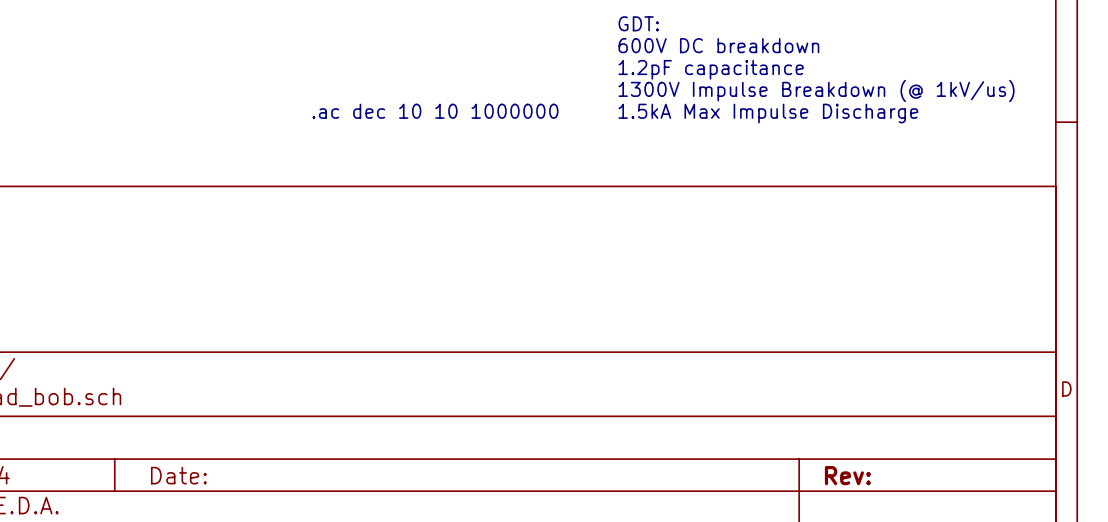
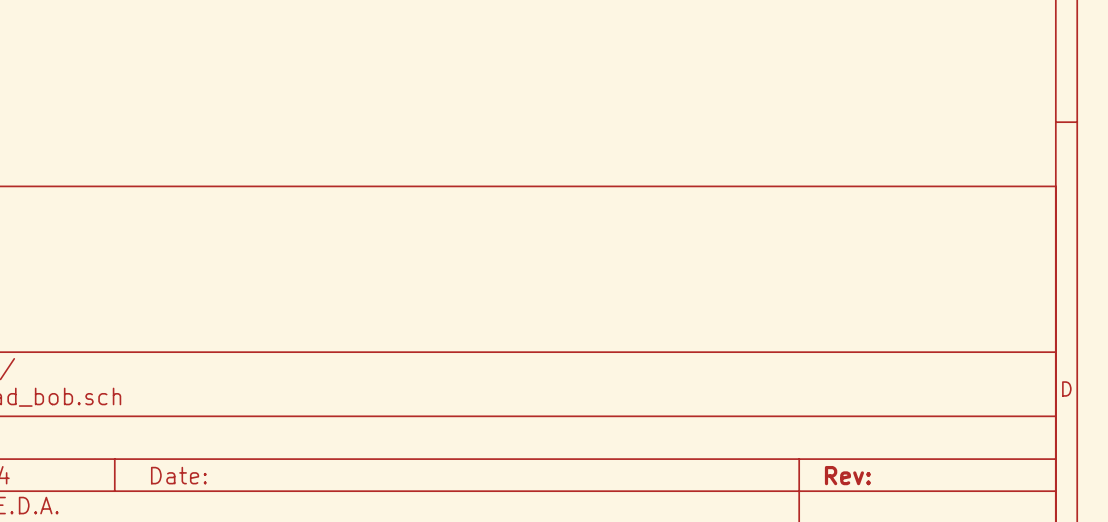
text: GDT: (638, 23) -> none
text: 600V DC breakdown (718, 45) -> none
text: 1.2pF capacitance (711, 69) -> none
text: 1300V Impulse Breakdown (@ 1kV/us) (816, 91) -> none
text: .ac dec 10 10 1000000 (435, 111) -> none
text: 1.5kA Max Impulse Discharge (768, 113) -> none

